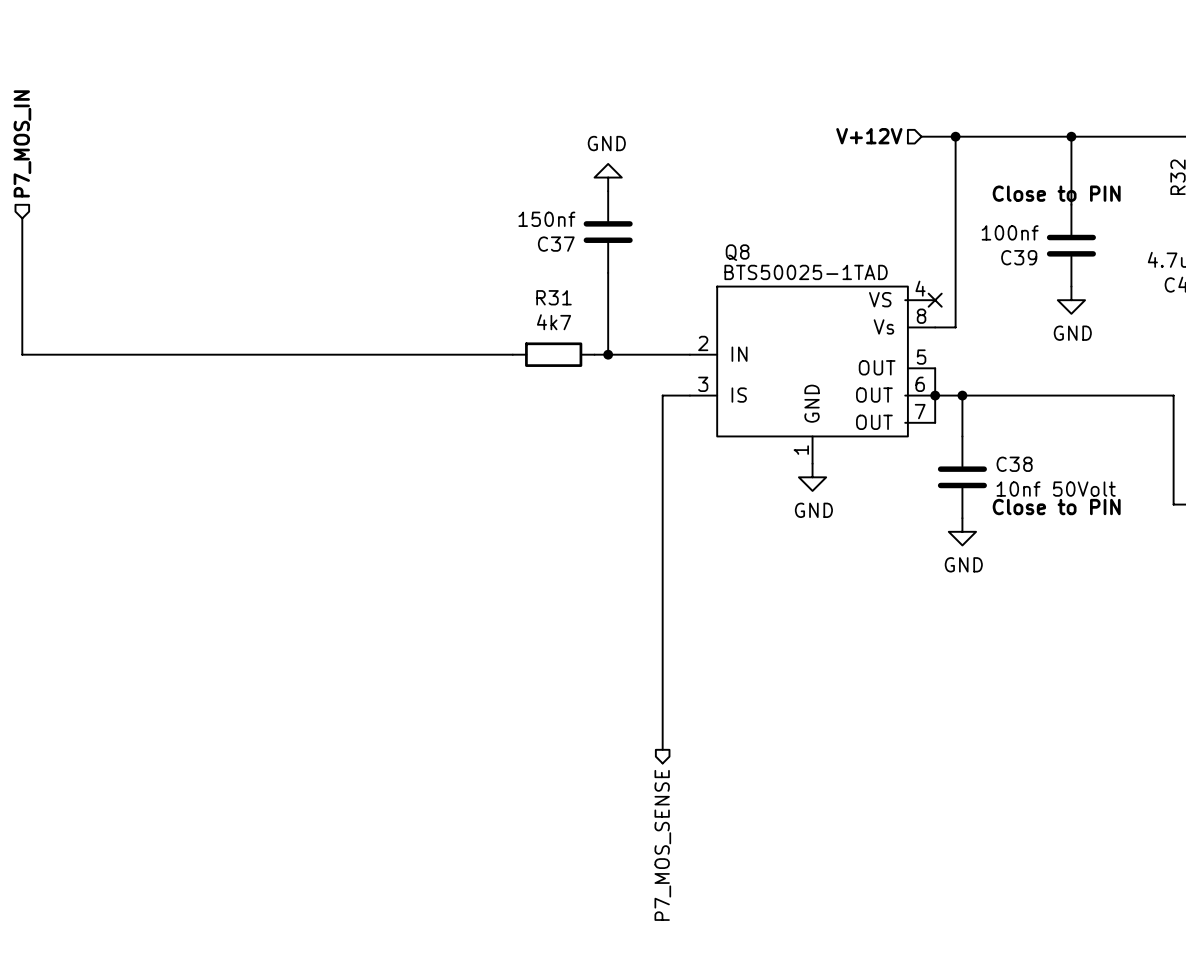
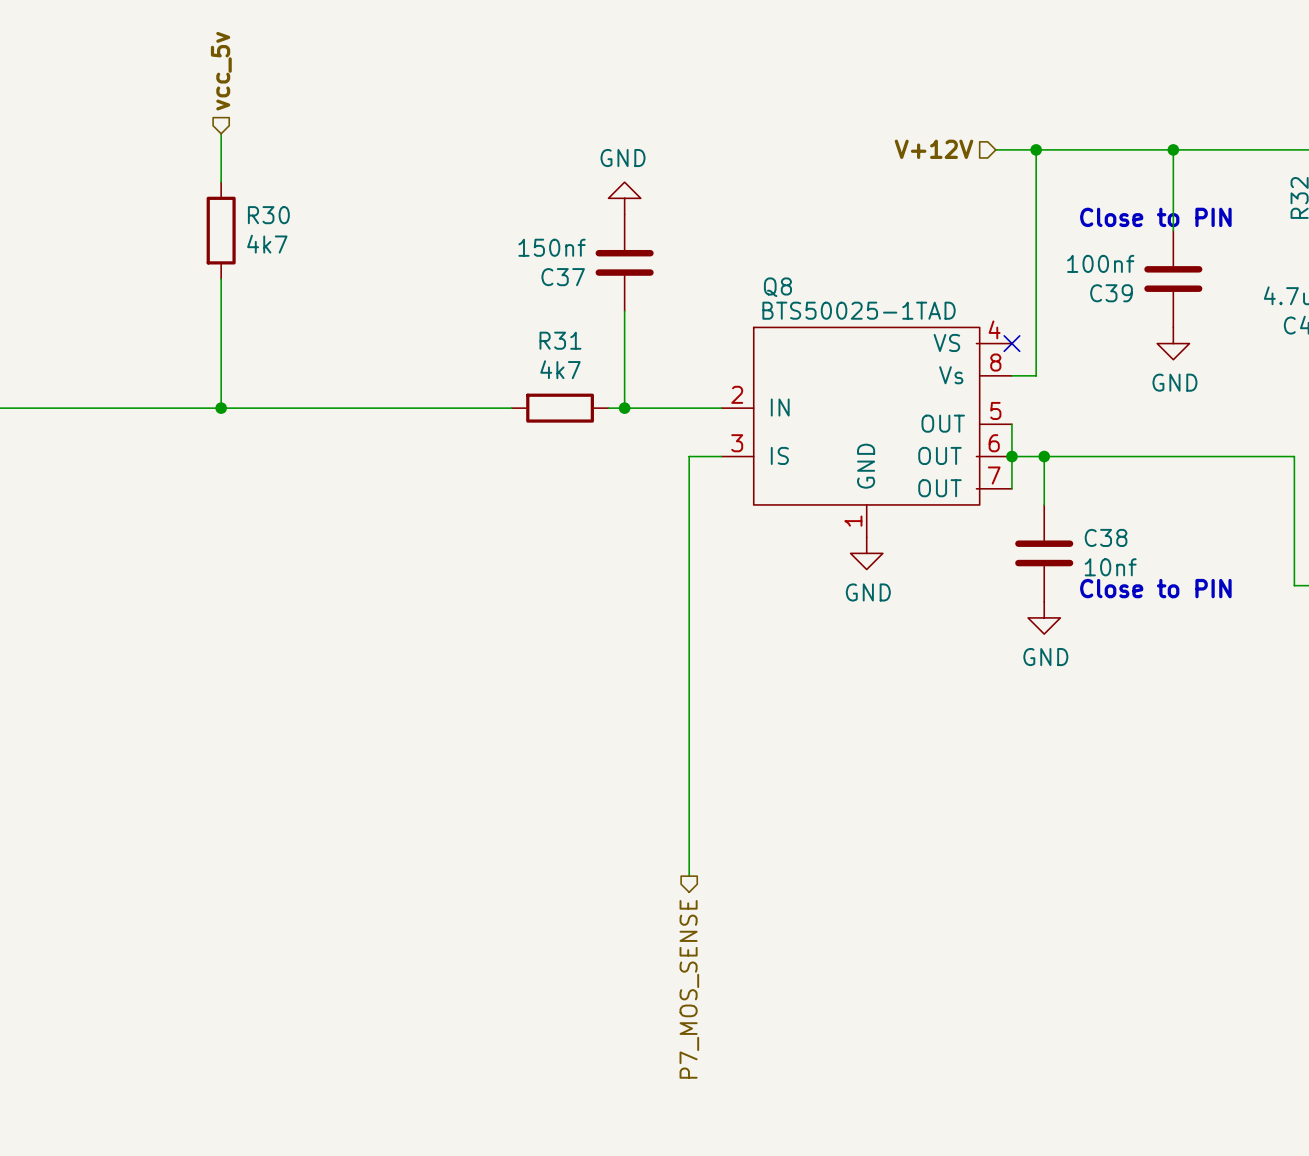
hierarchical label: none -> vcc_5v (221, 71)
wire: none -> (221, 133) (221, 182)
R30: none -> 4k7 (221, 230)
wire: none -> (221, 279) (221, 408)
junction: none -> (221, 408)
C38 value: 10nf 50Volt (1056, 489) -> 10nf (1110, 567)

